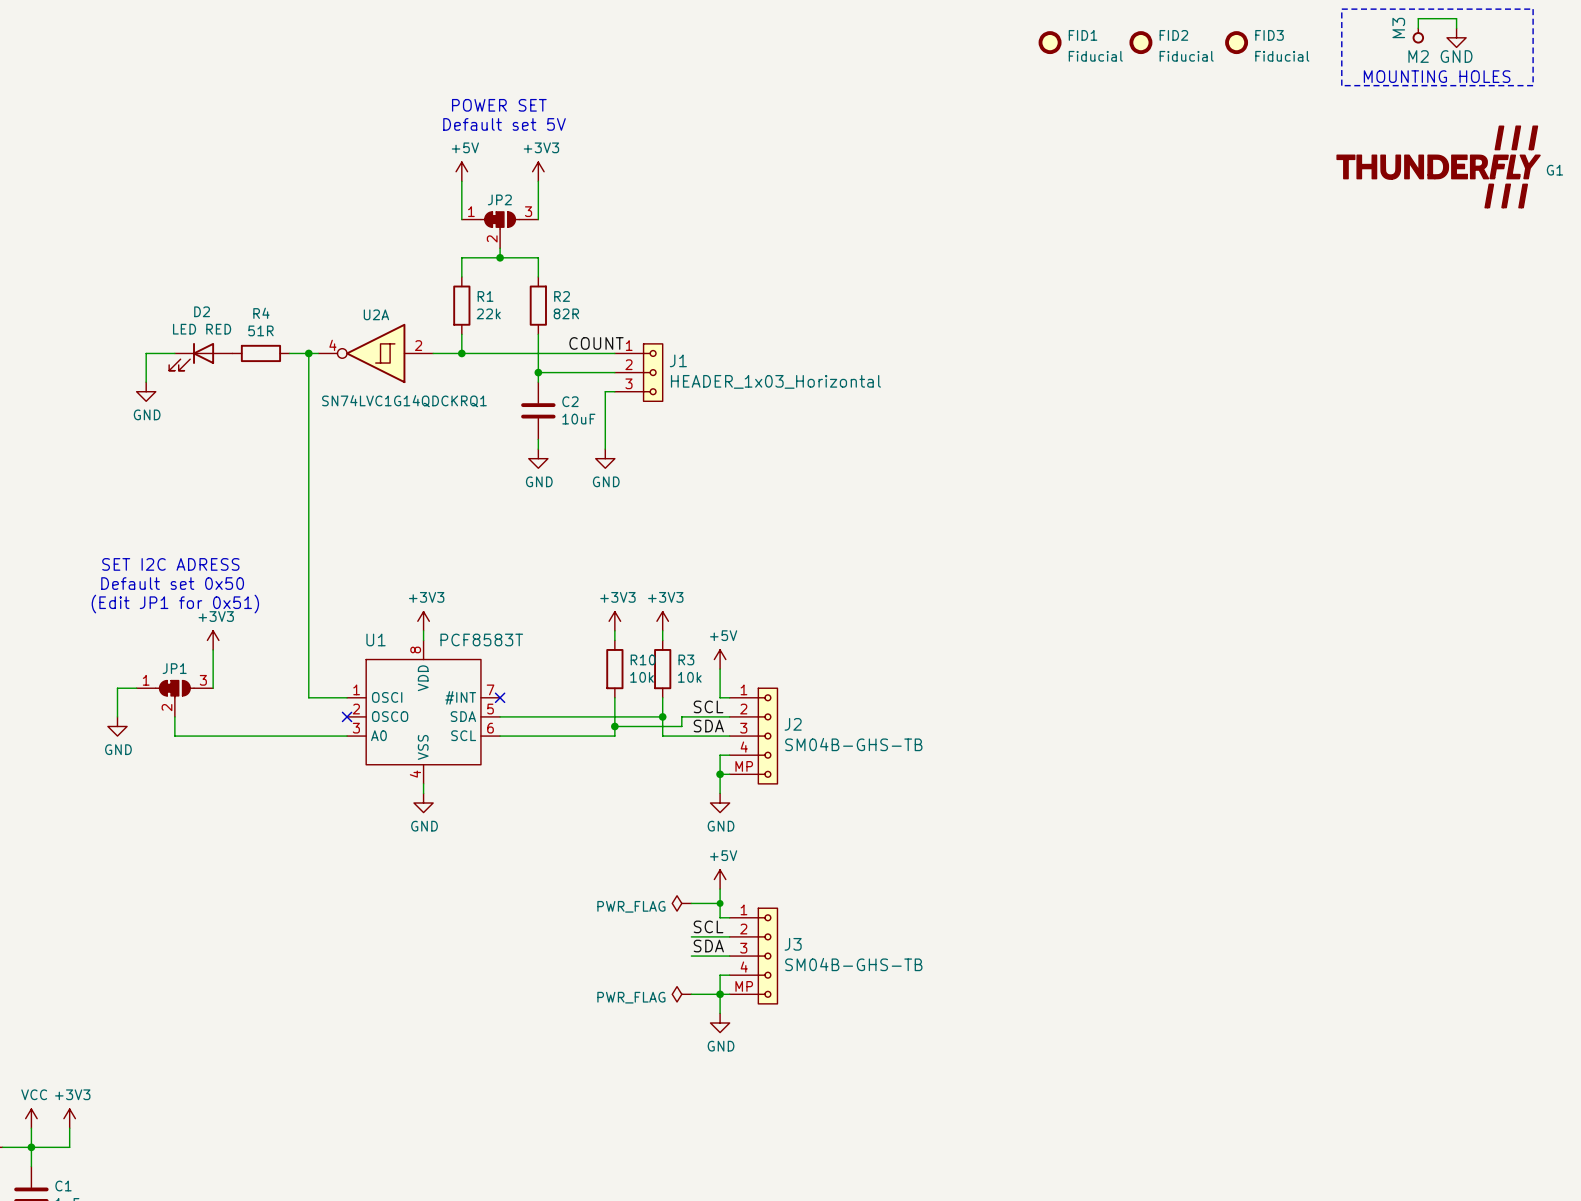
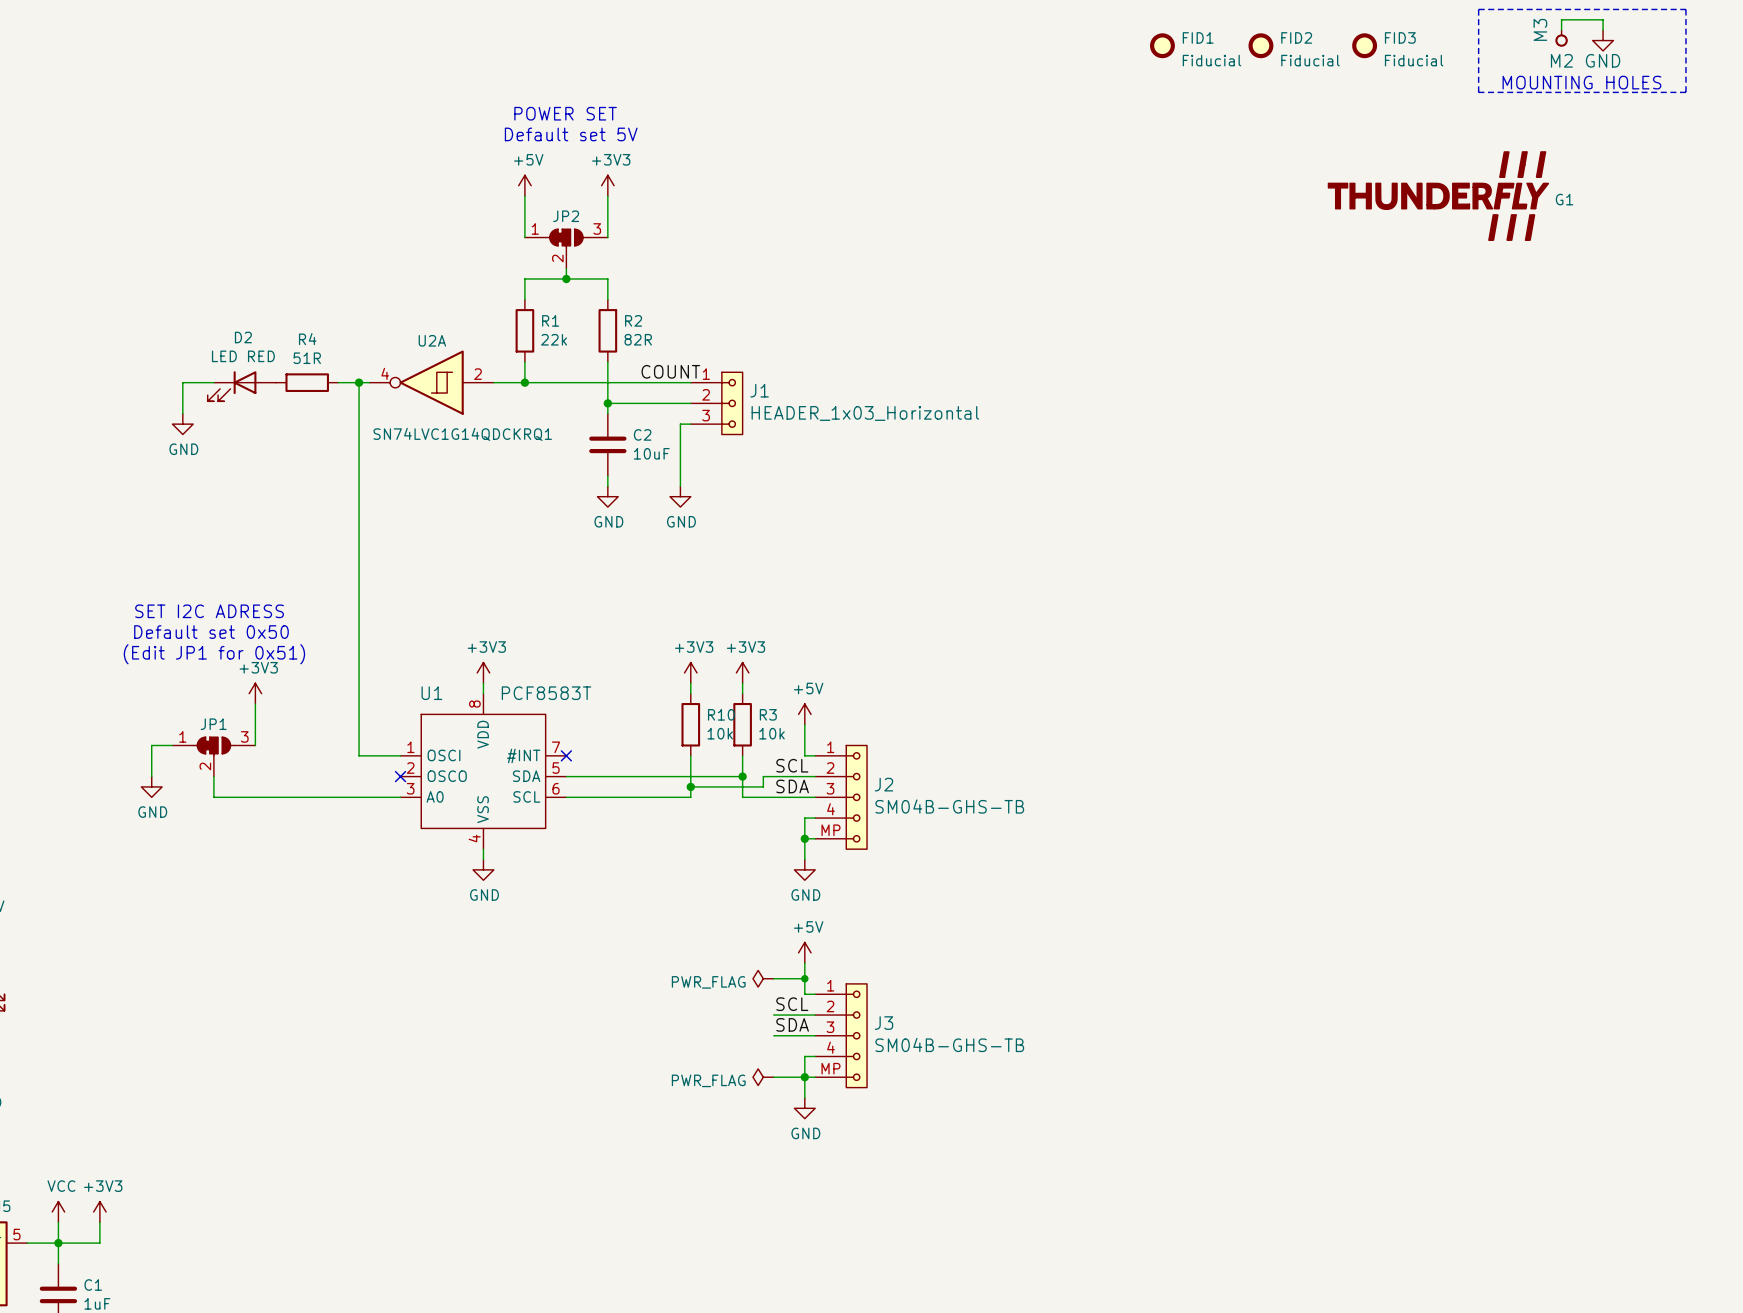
G1 position: (1438, 166) -> (1438, 196)

